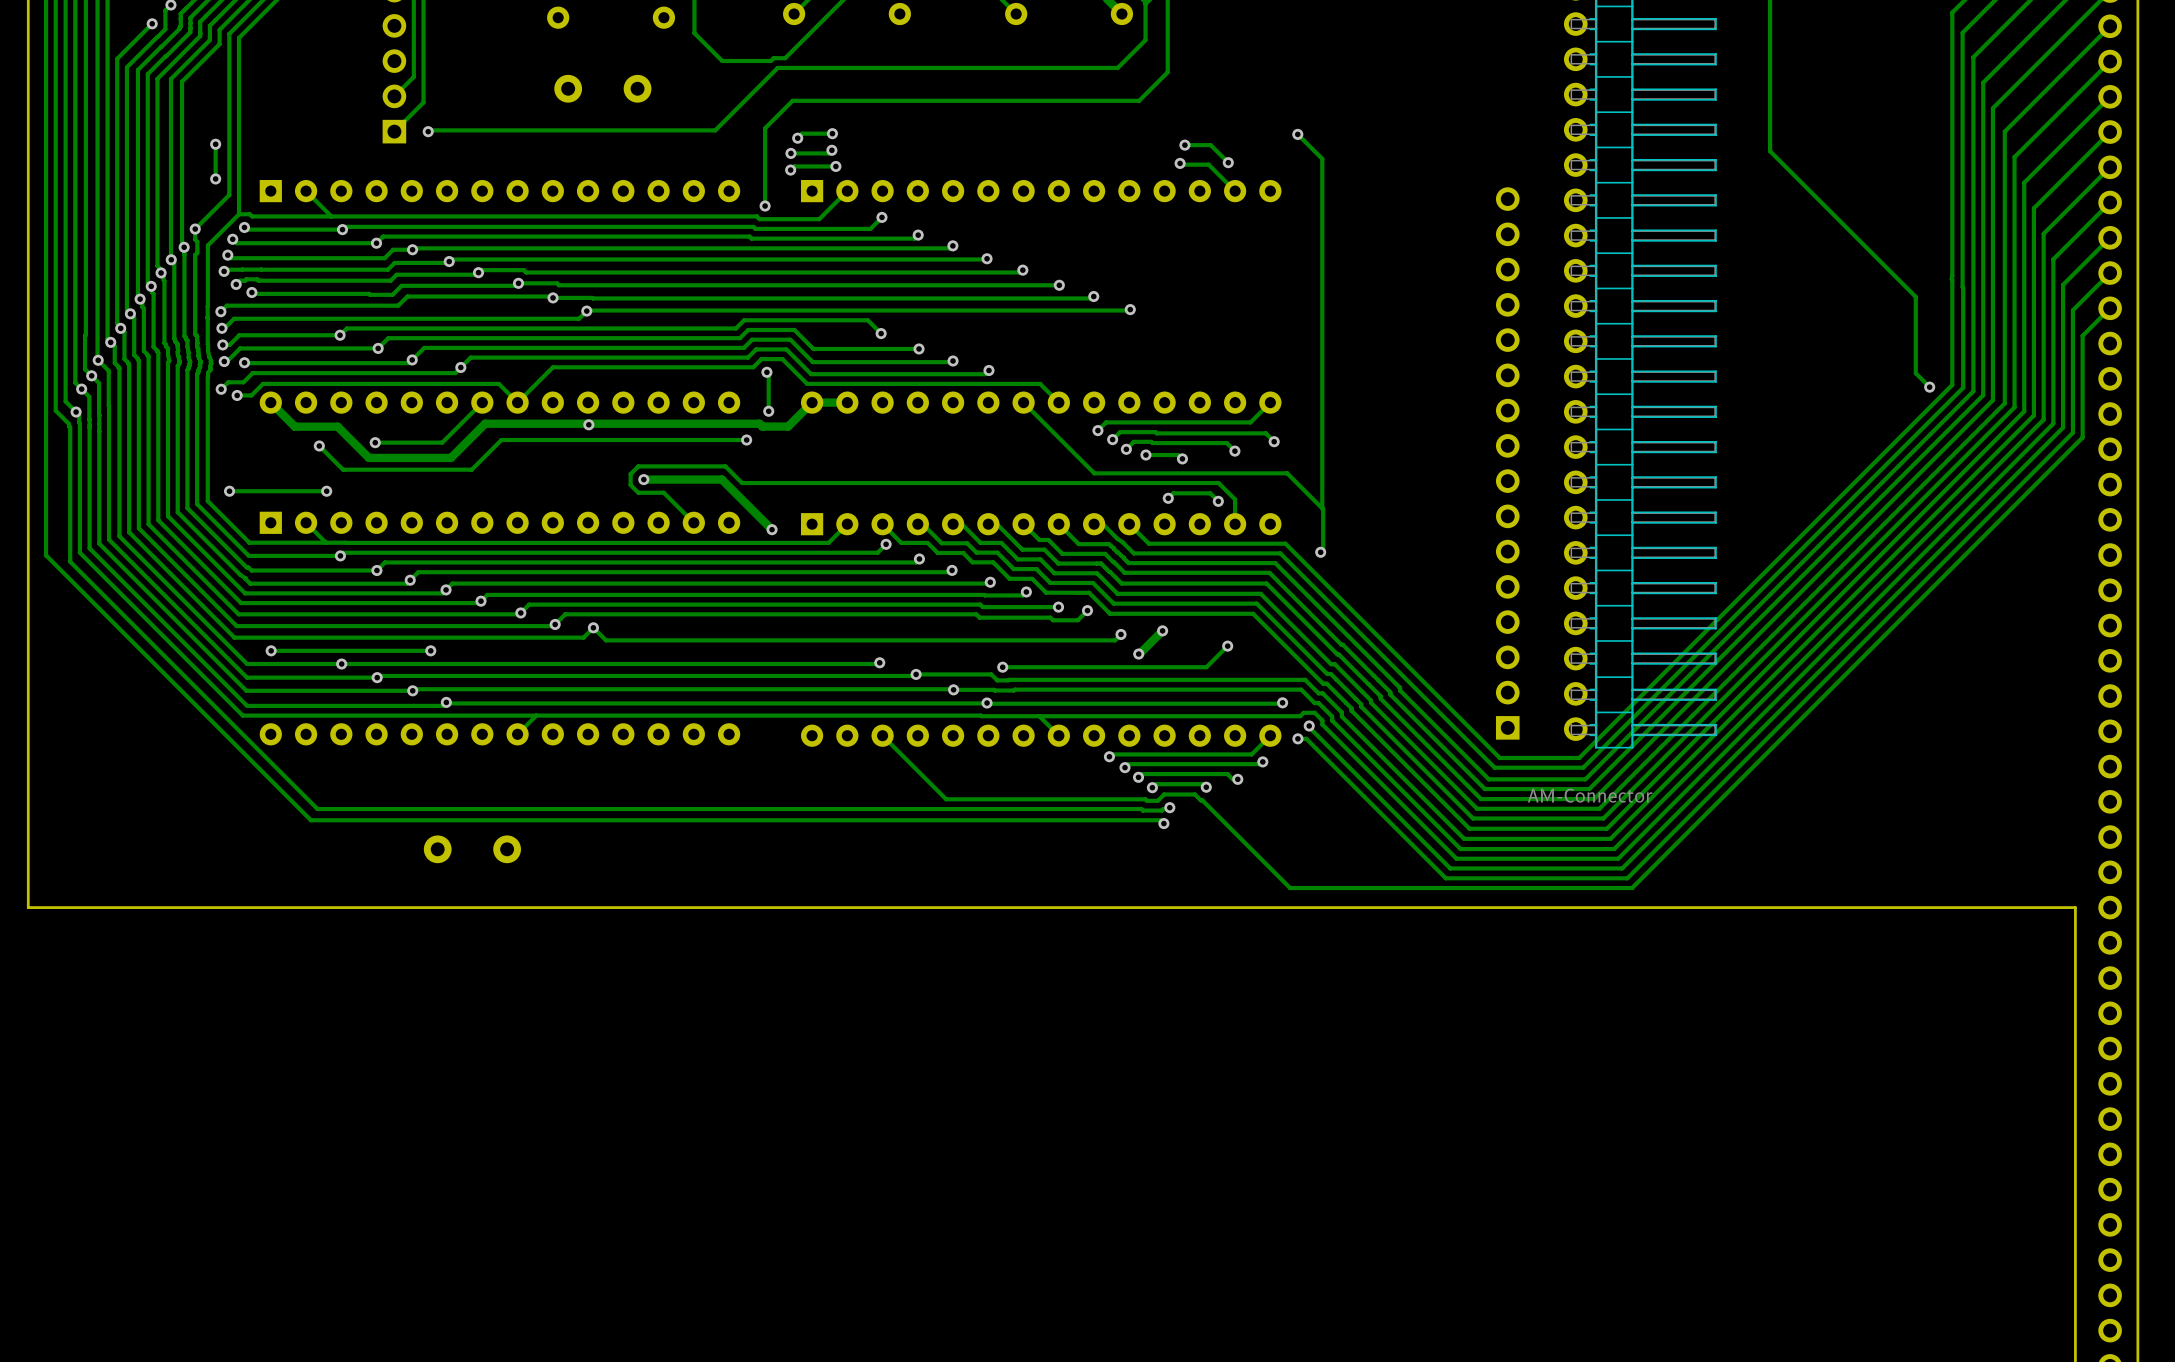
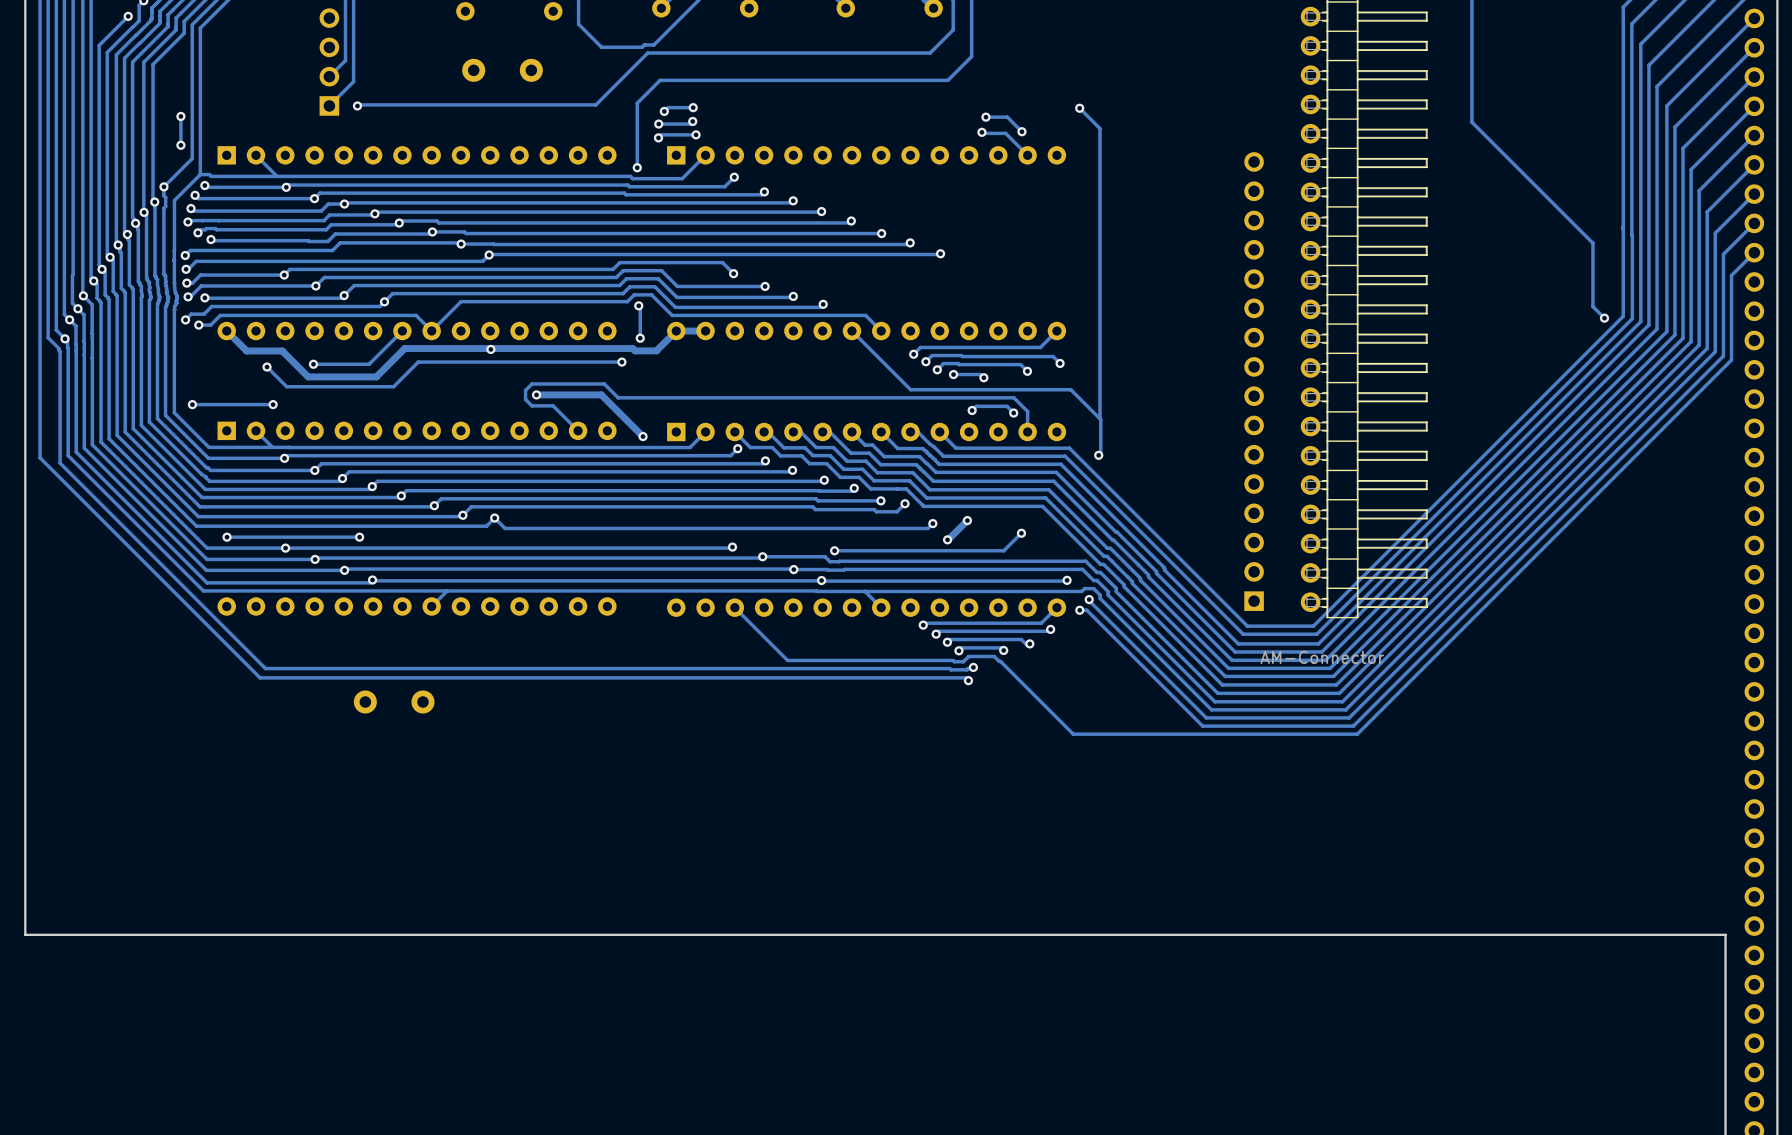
board edge: (28, 907) (2075, 907) (2075, 1129) -> (25, 750) (25, 934) (1725, 934)

